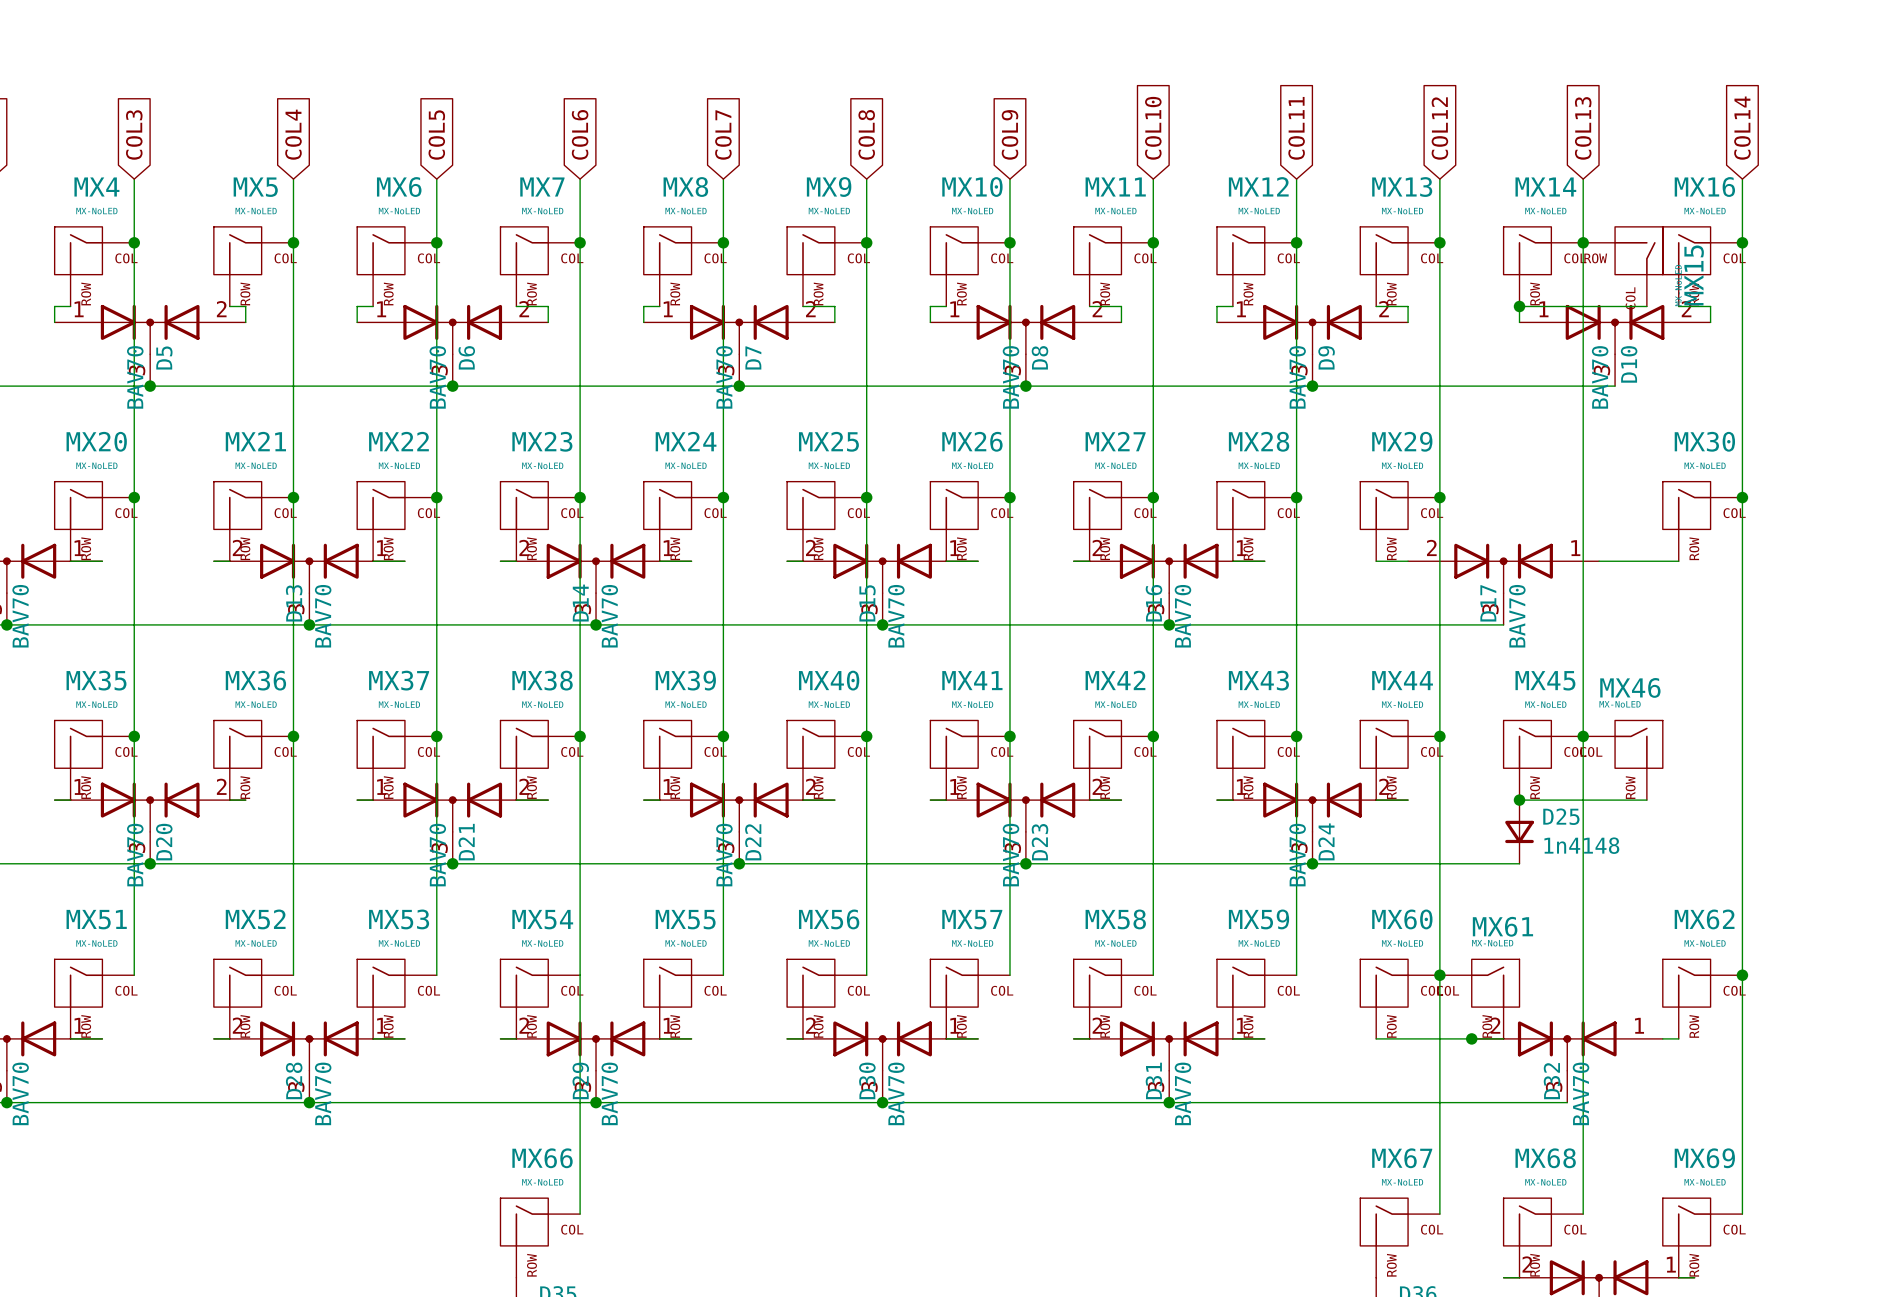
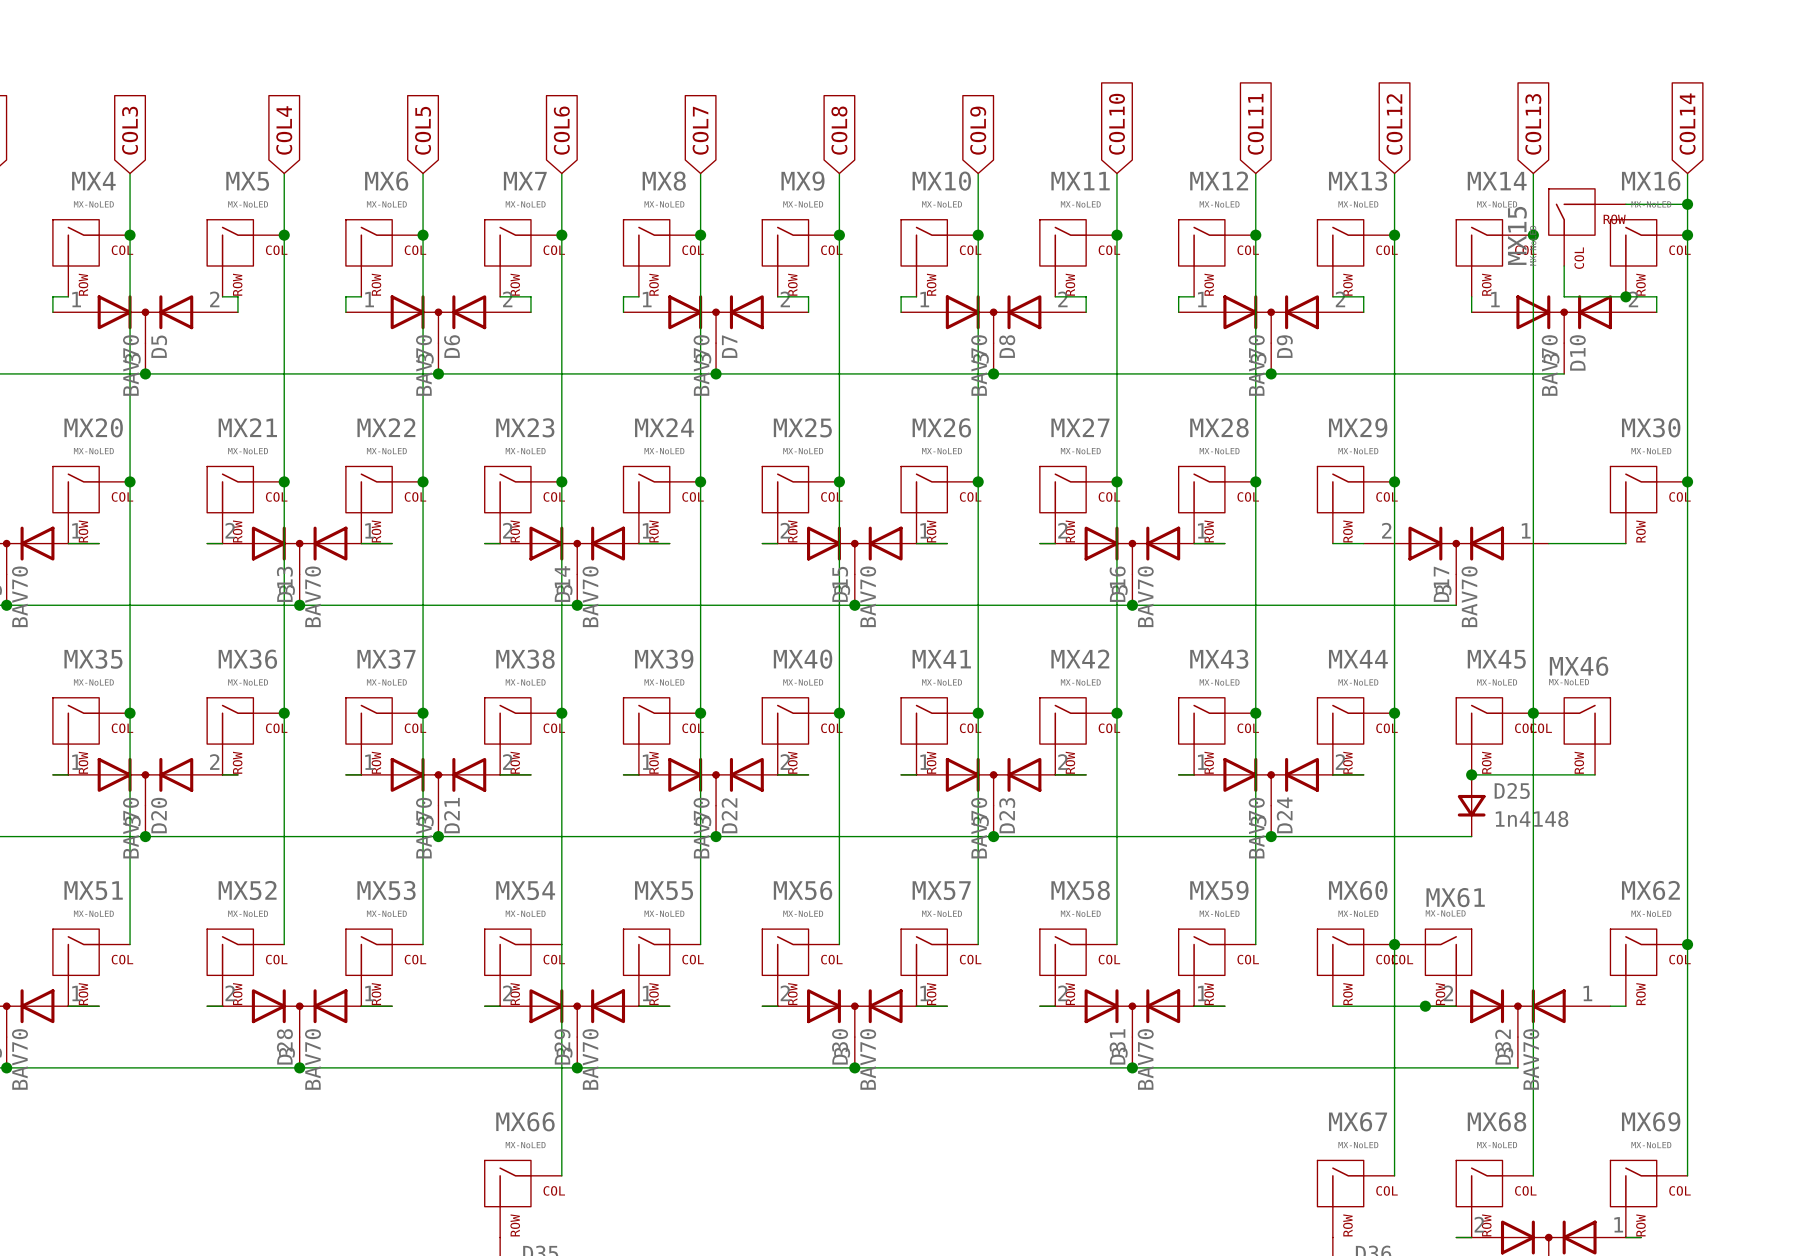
wire: none -> (1625, 204) (1687, 204)
junction: none -> (1687, 204)
MX15 flip: as is (1638, 251) -> left-right (1572, 212)
wire: (1519, 306) (1615, 306) -> (1564, 266) (1564, 296)
junction: (1519, 306) -> none
wire: none -> (1595, 296) (1625, 296)
junction: none -> (1625, 296)

